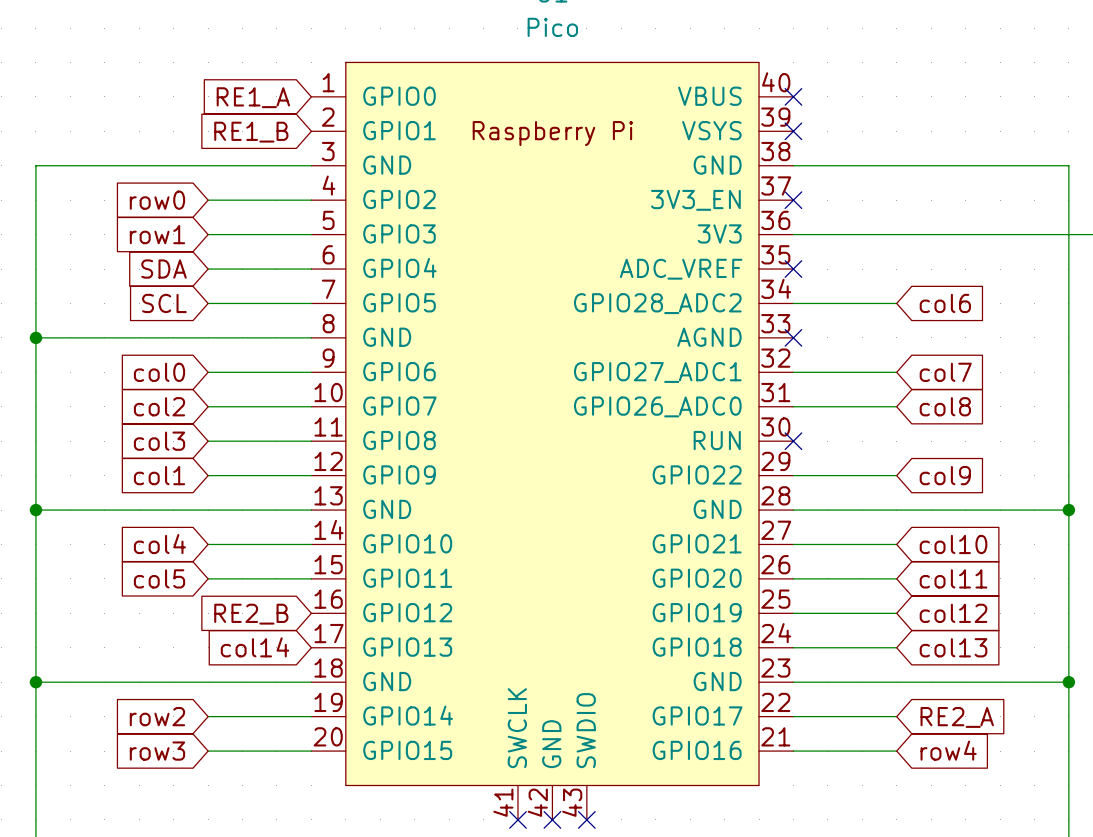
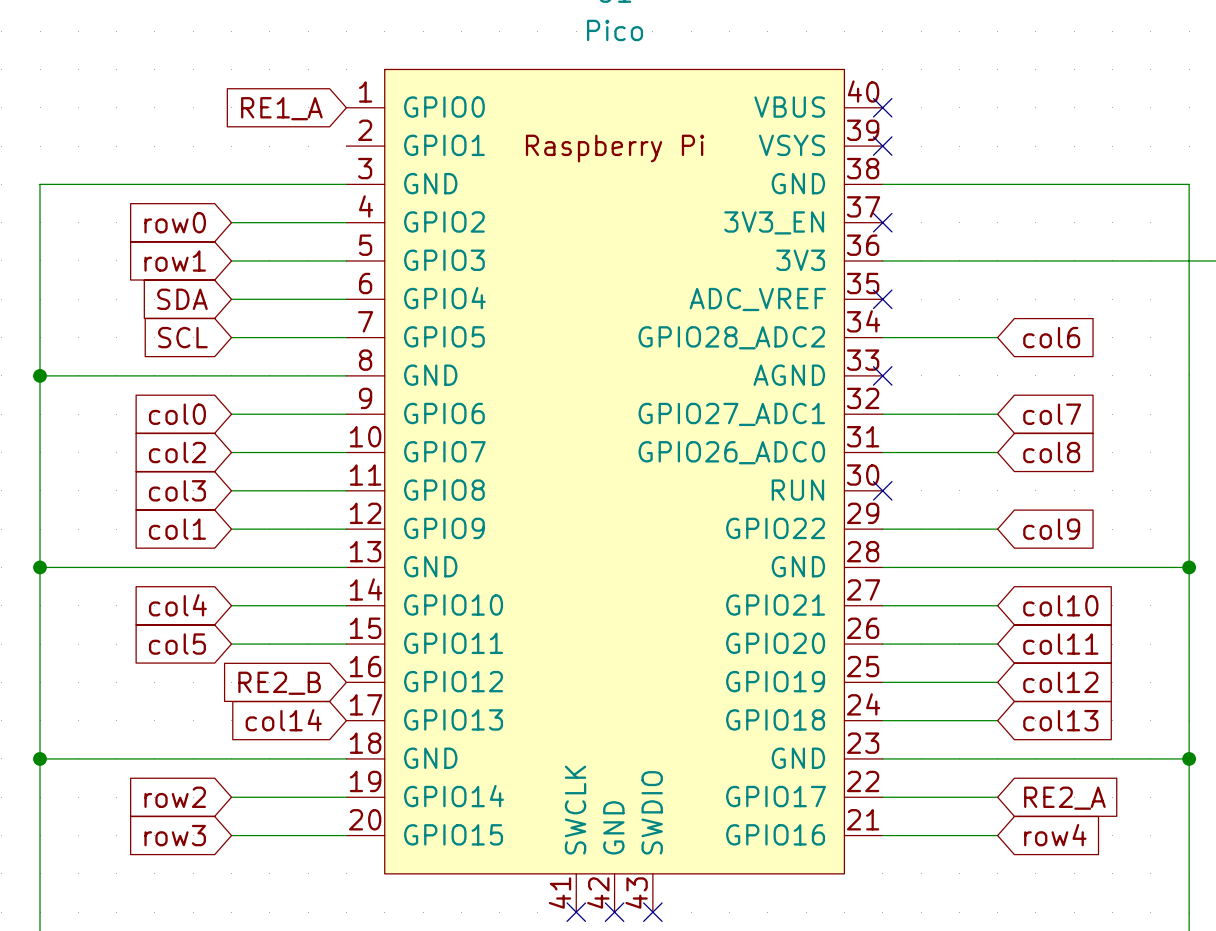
global label: RE1_B (251, 132) -> none

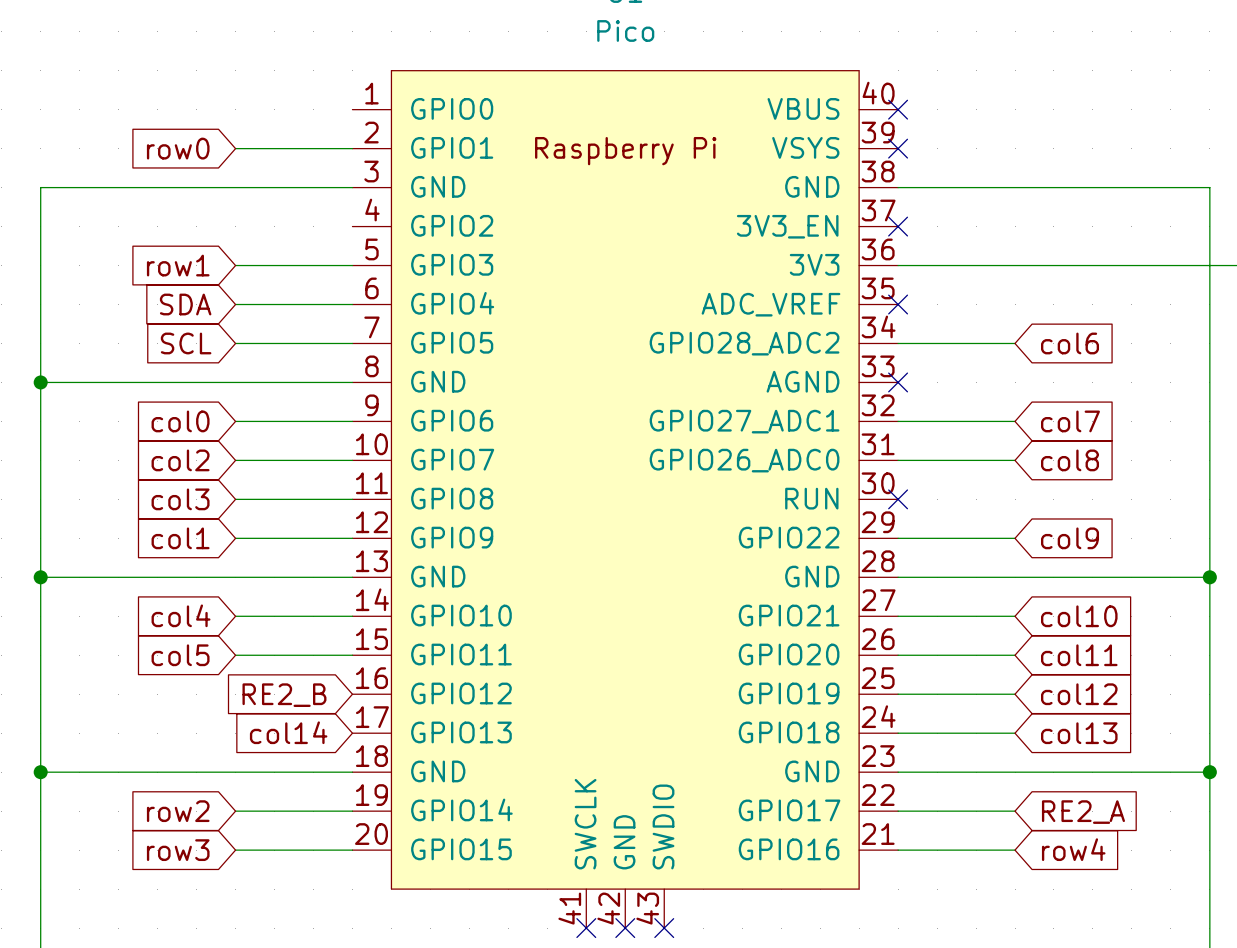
global label: RE1_A (281, 108) -> none
global label position: row0 (175, 222) -> row0 (178, 148)
wire: (231, 222) (346, 222) -> (235, 148) (352, 148)

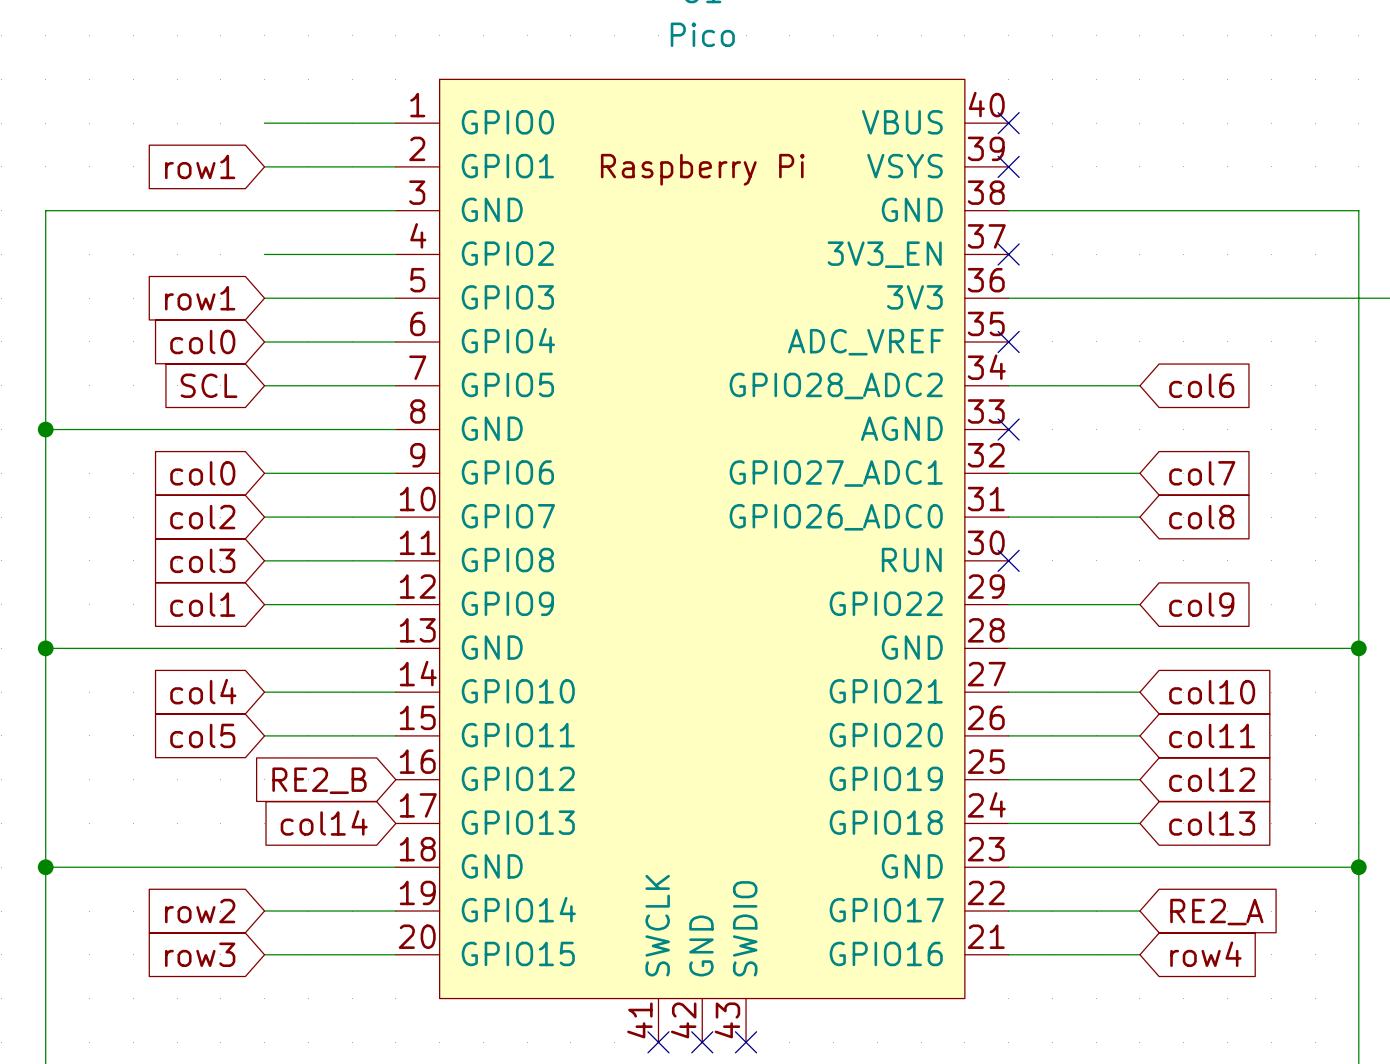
wire: none -> (264, 123) (395, 123)
global label: row0 (178, 148) -> row1 (200, 166)
wire: none -> (264, 254) (395, 254)
global label: SDA (185, 304) -> col0 (202, 341)

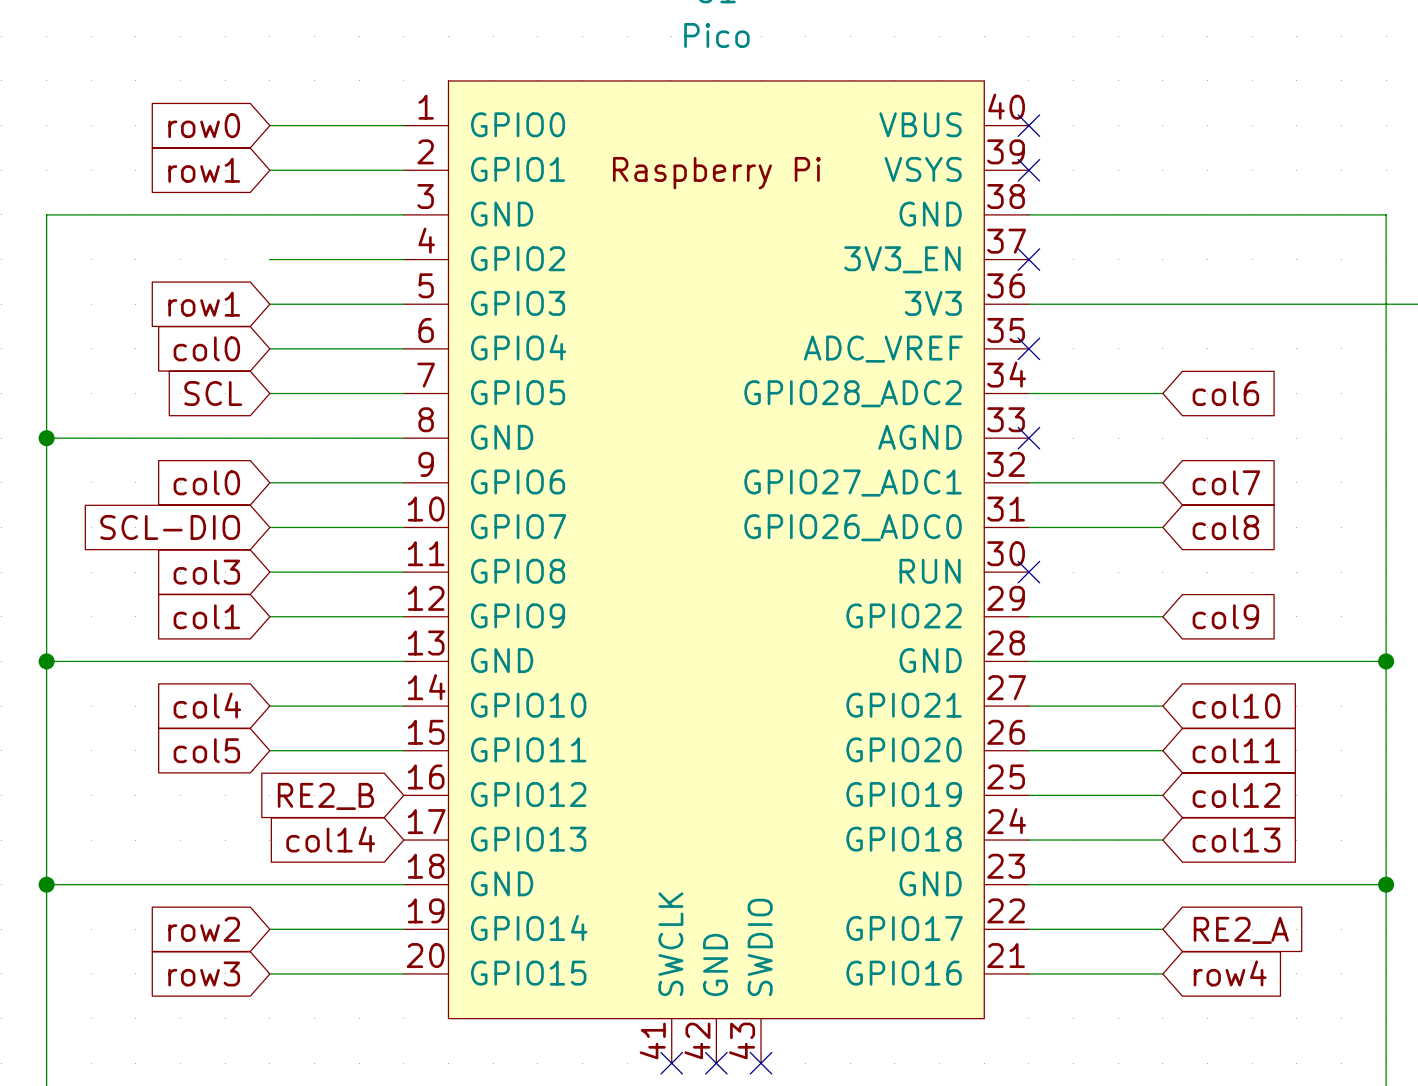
global label: none -> row0 (204, 125)
global label: col2 (202, 517) -> SCL-DIO (170, 527)

